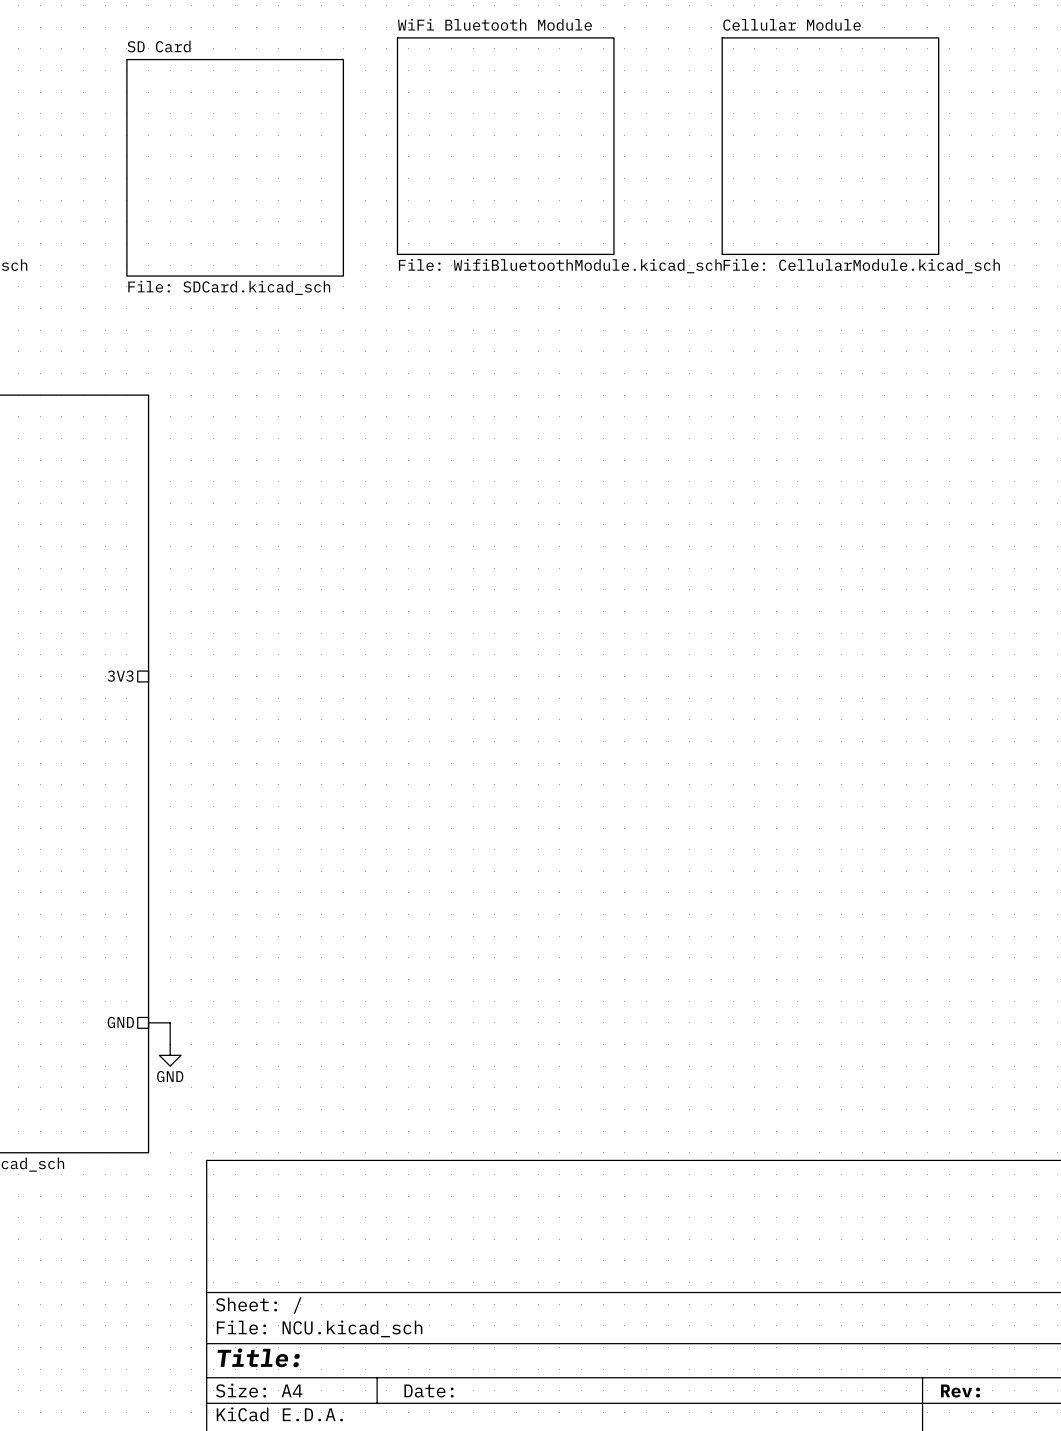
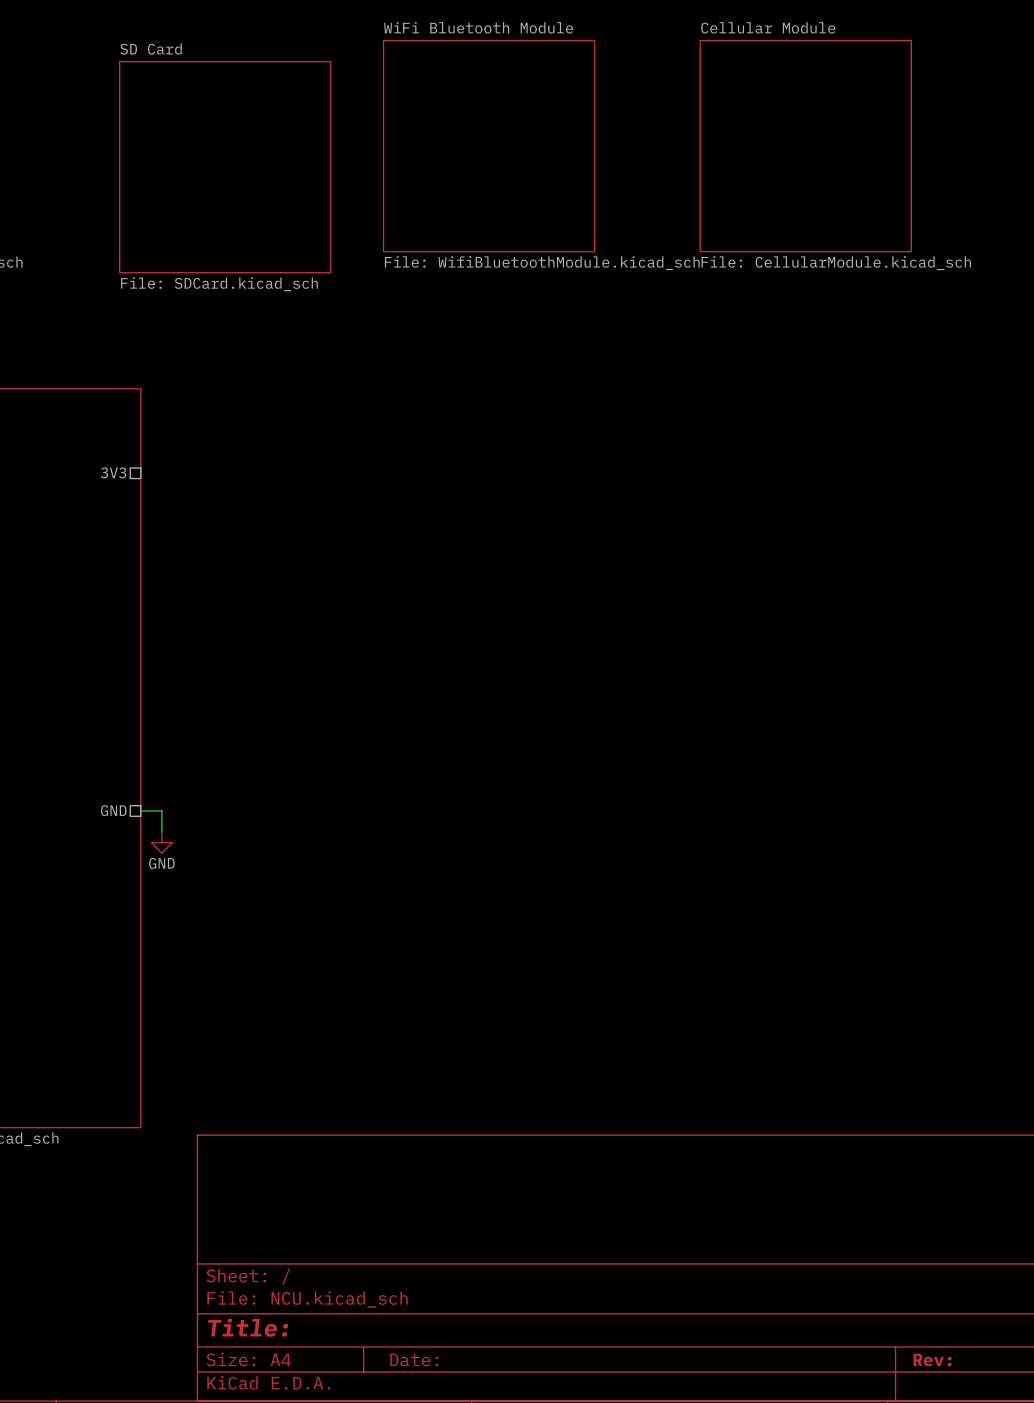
sheet pin position: 3V3 (120, 676) -> 3V3 (113, 472)
sheet pin position: GND (120, 1022) -> GND (113, 810)
wire: (148, 1022) (170, 1022) (170, 1044) -> (140, 811) (161, 811) (161, 832)
power symbol position: GND (170, 1055) -> GND (161, 842)

